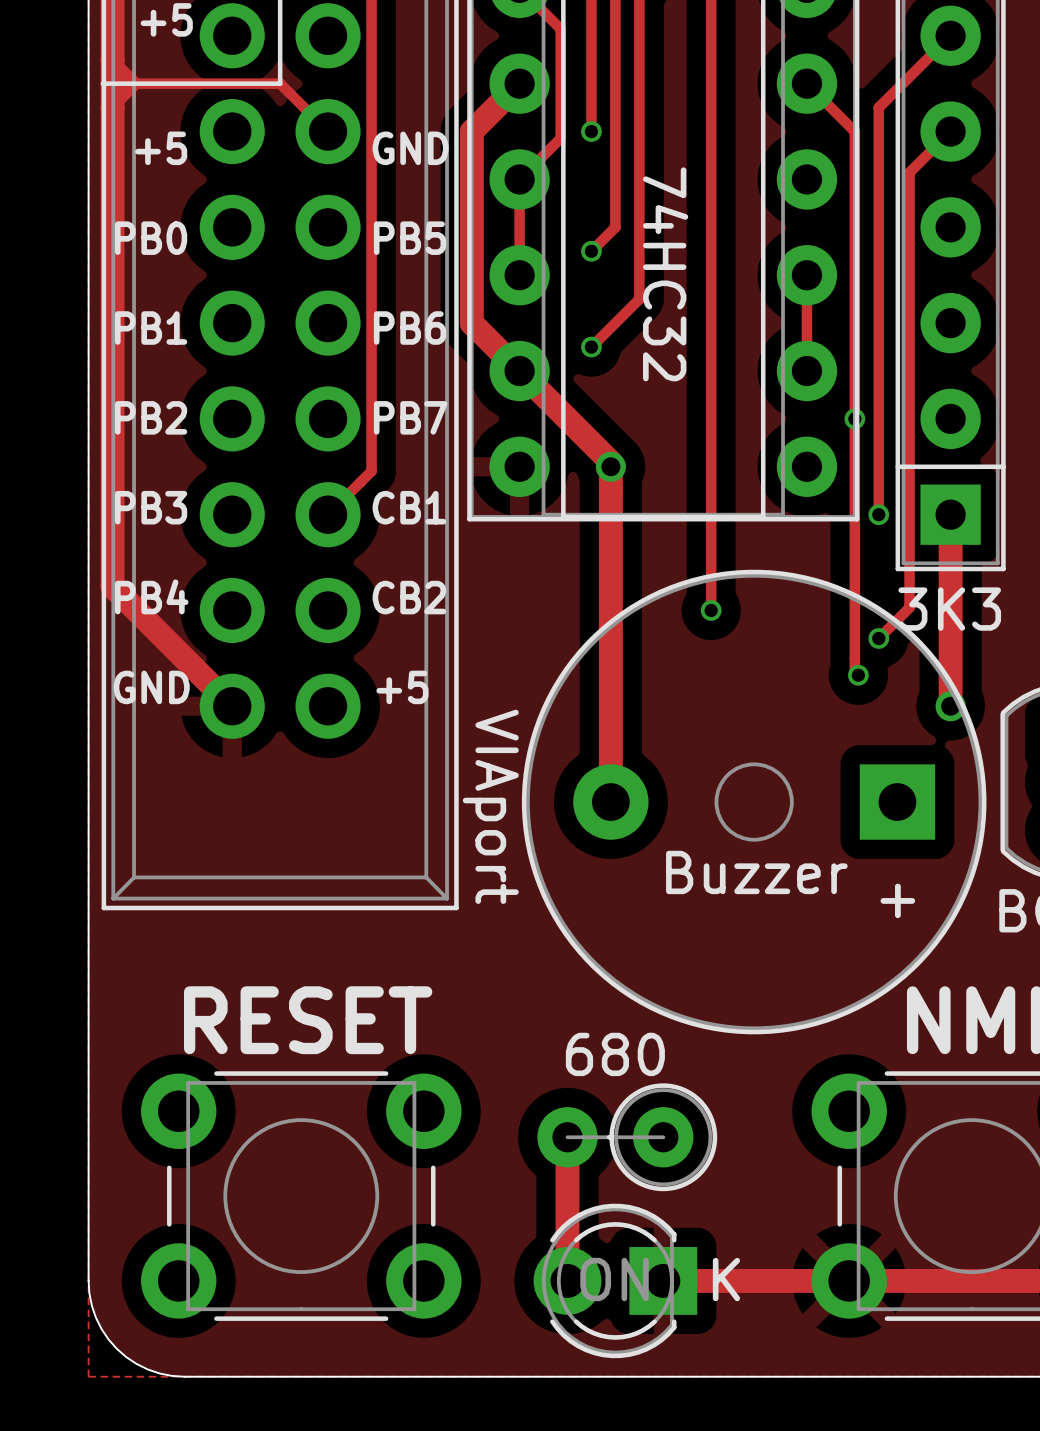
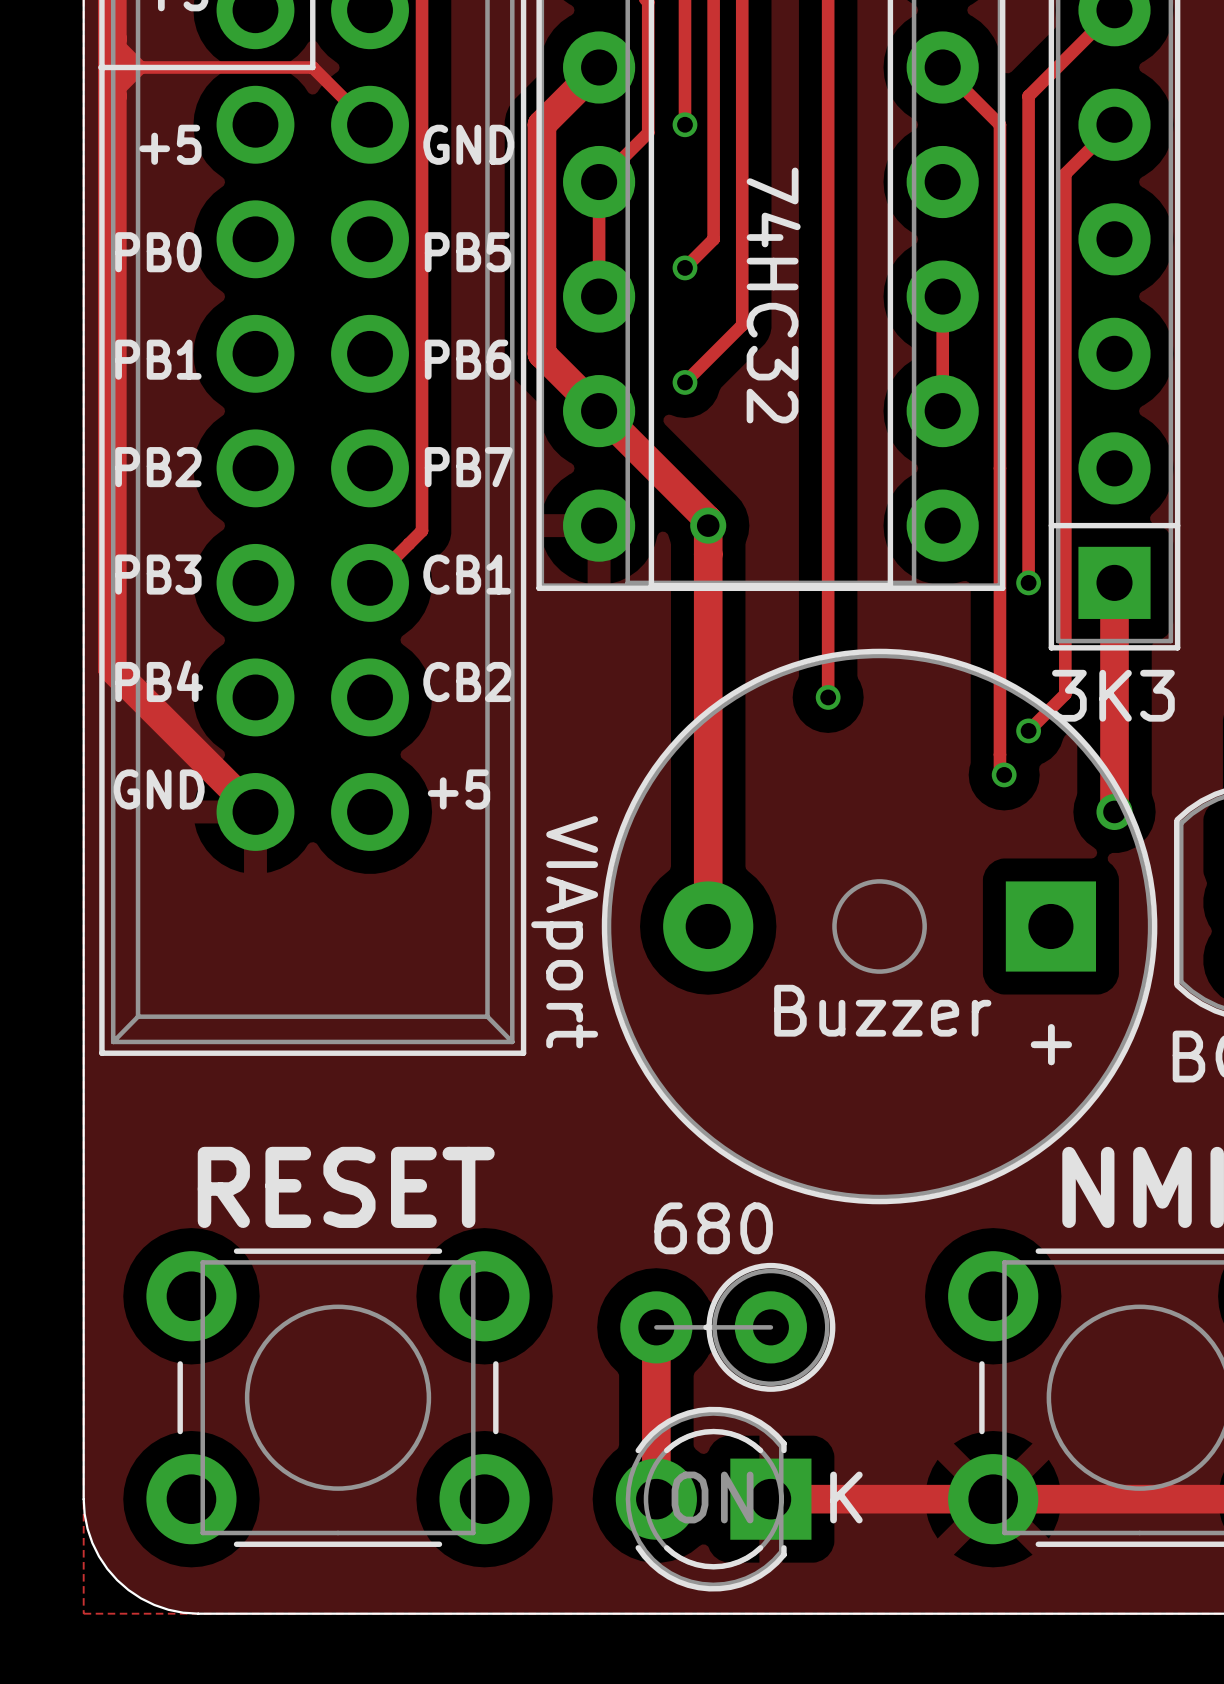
via: (854, 418) -> none

